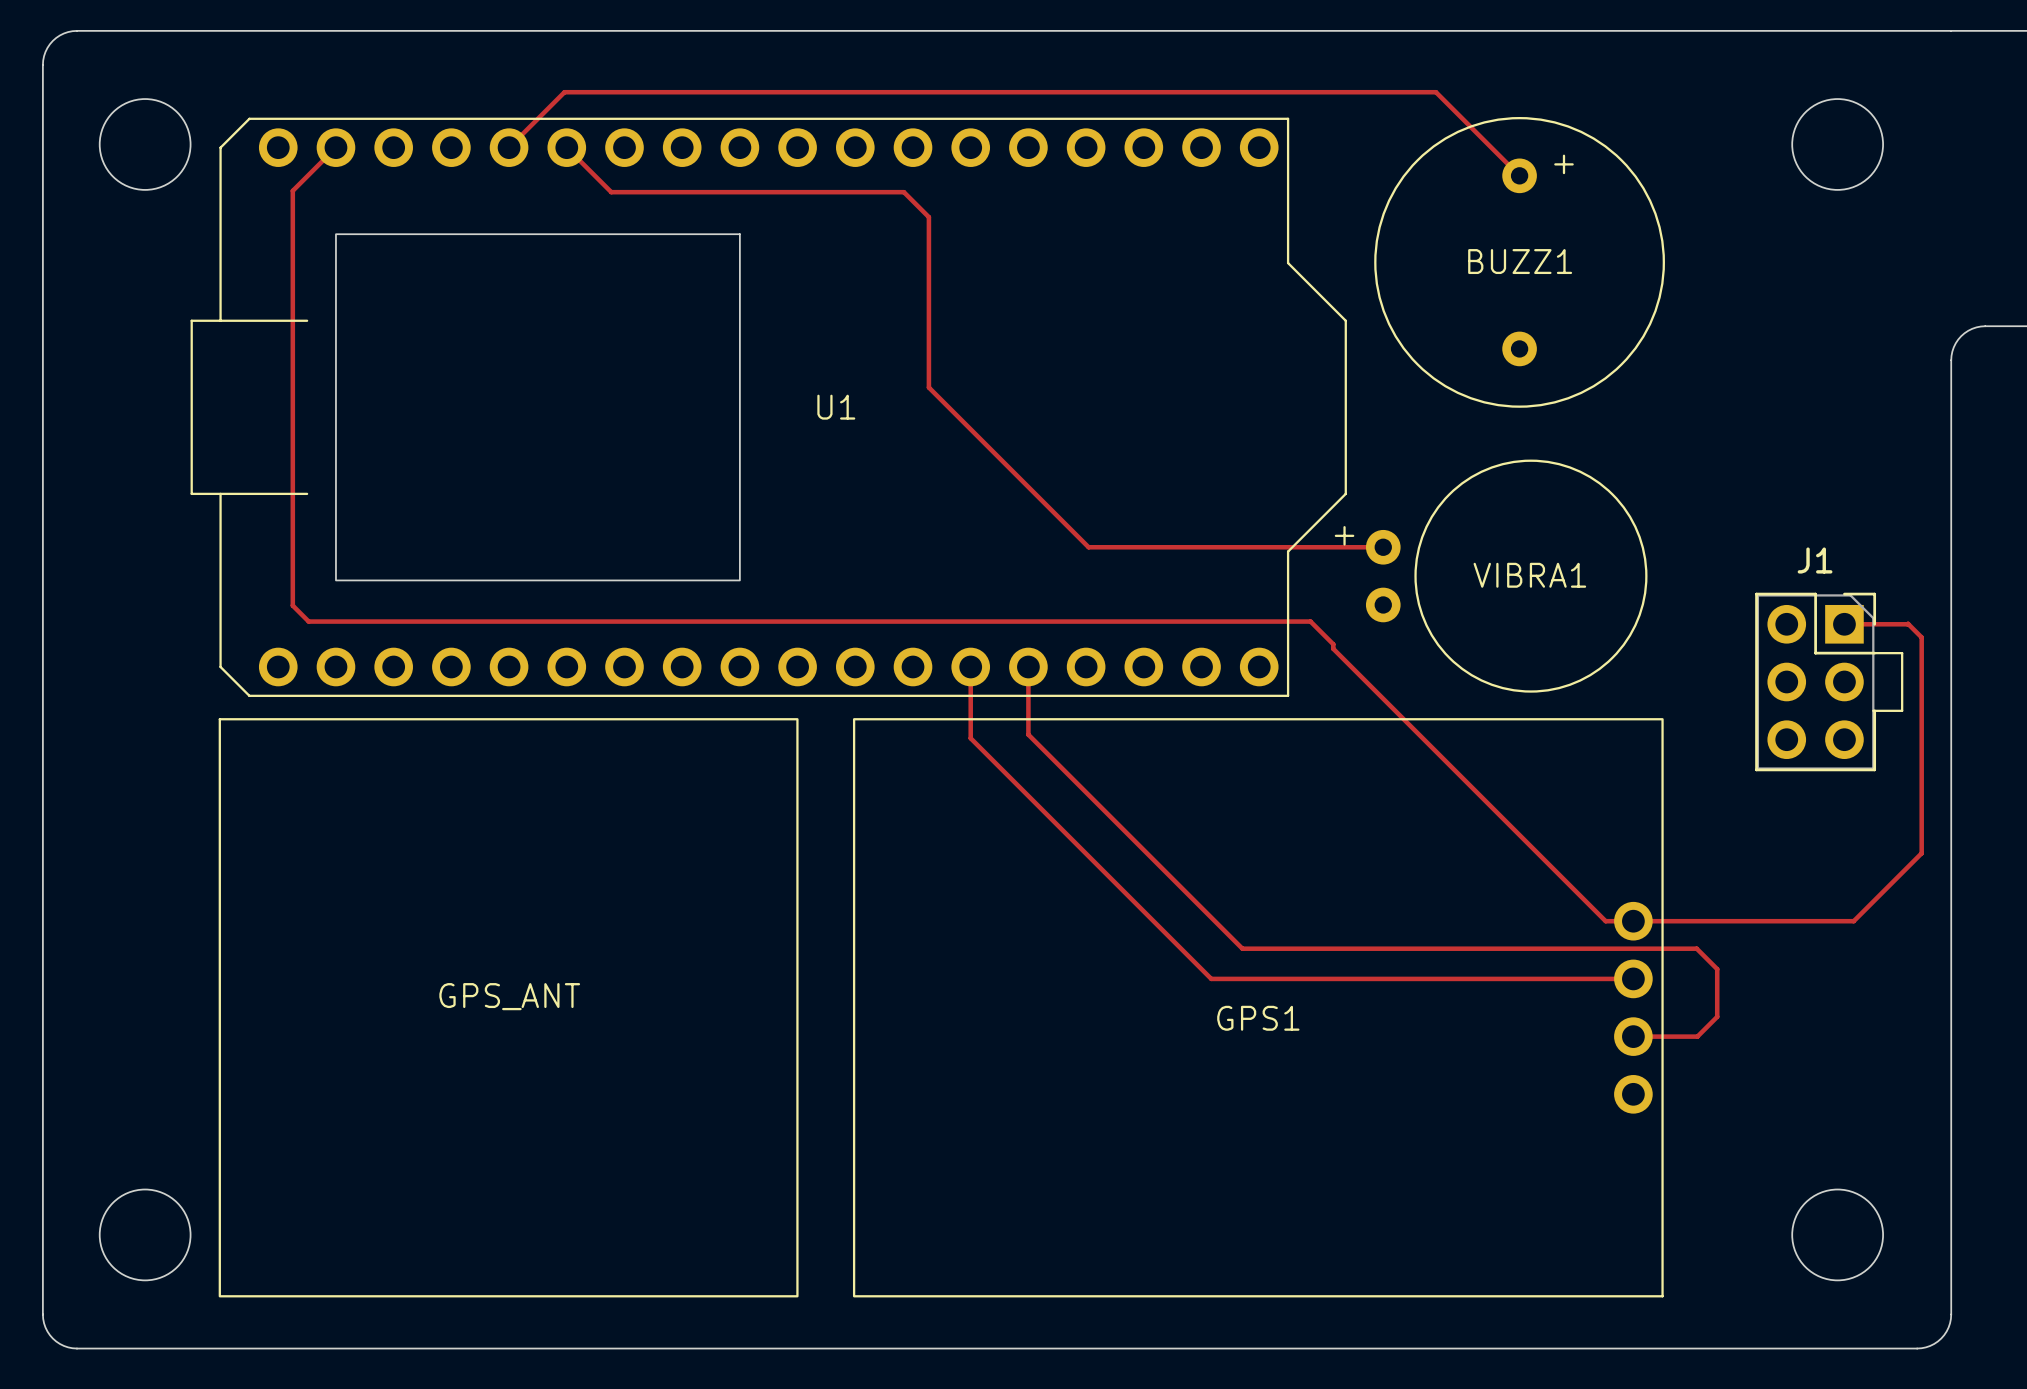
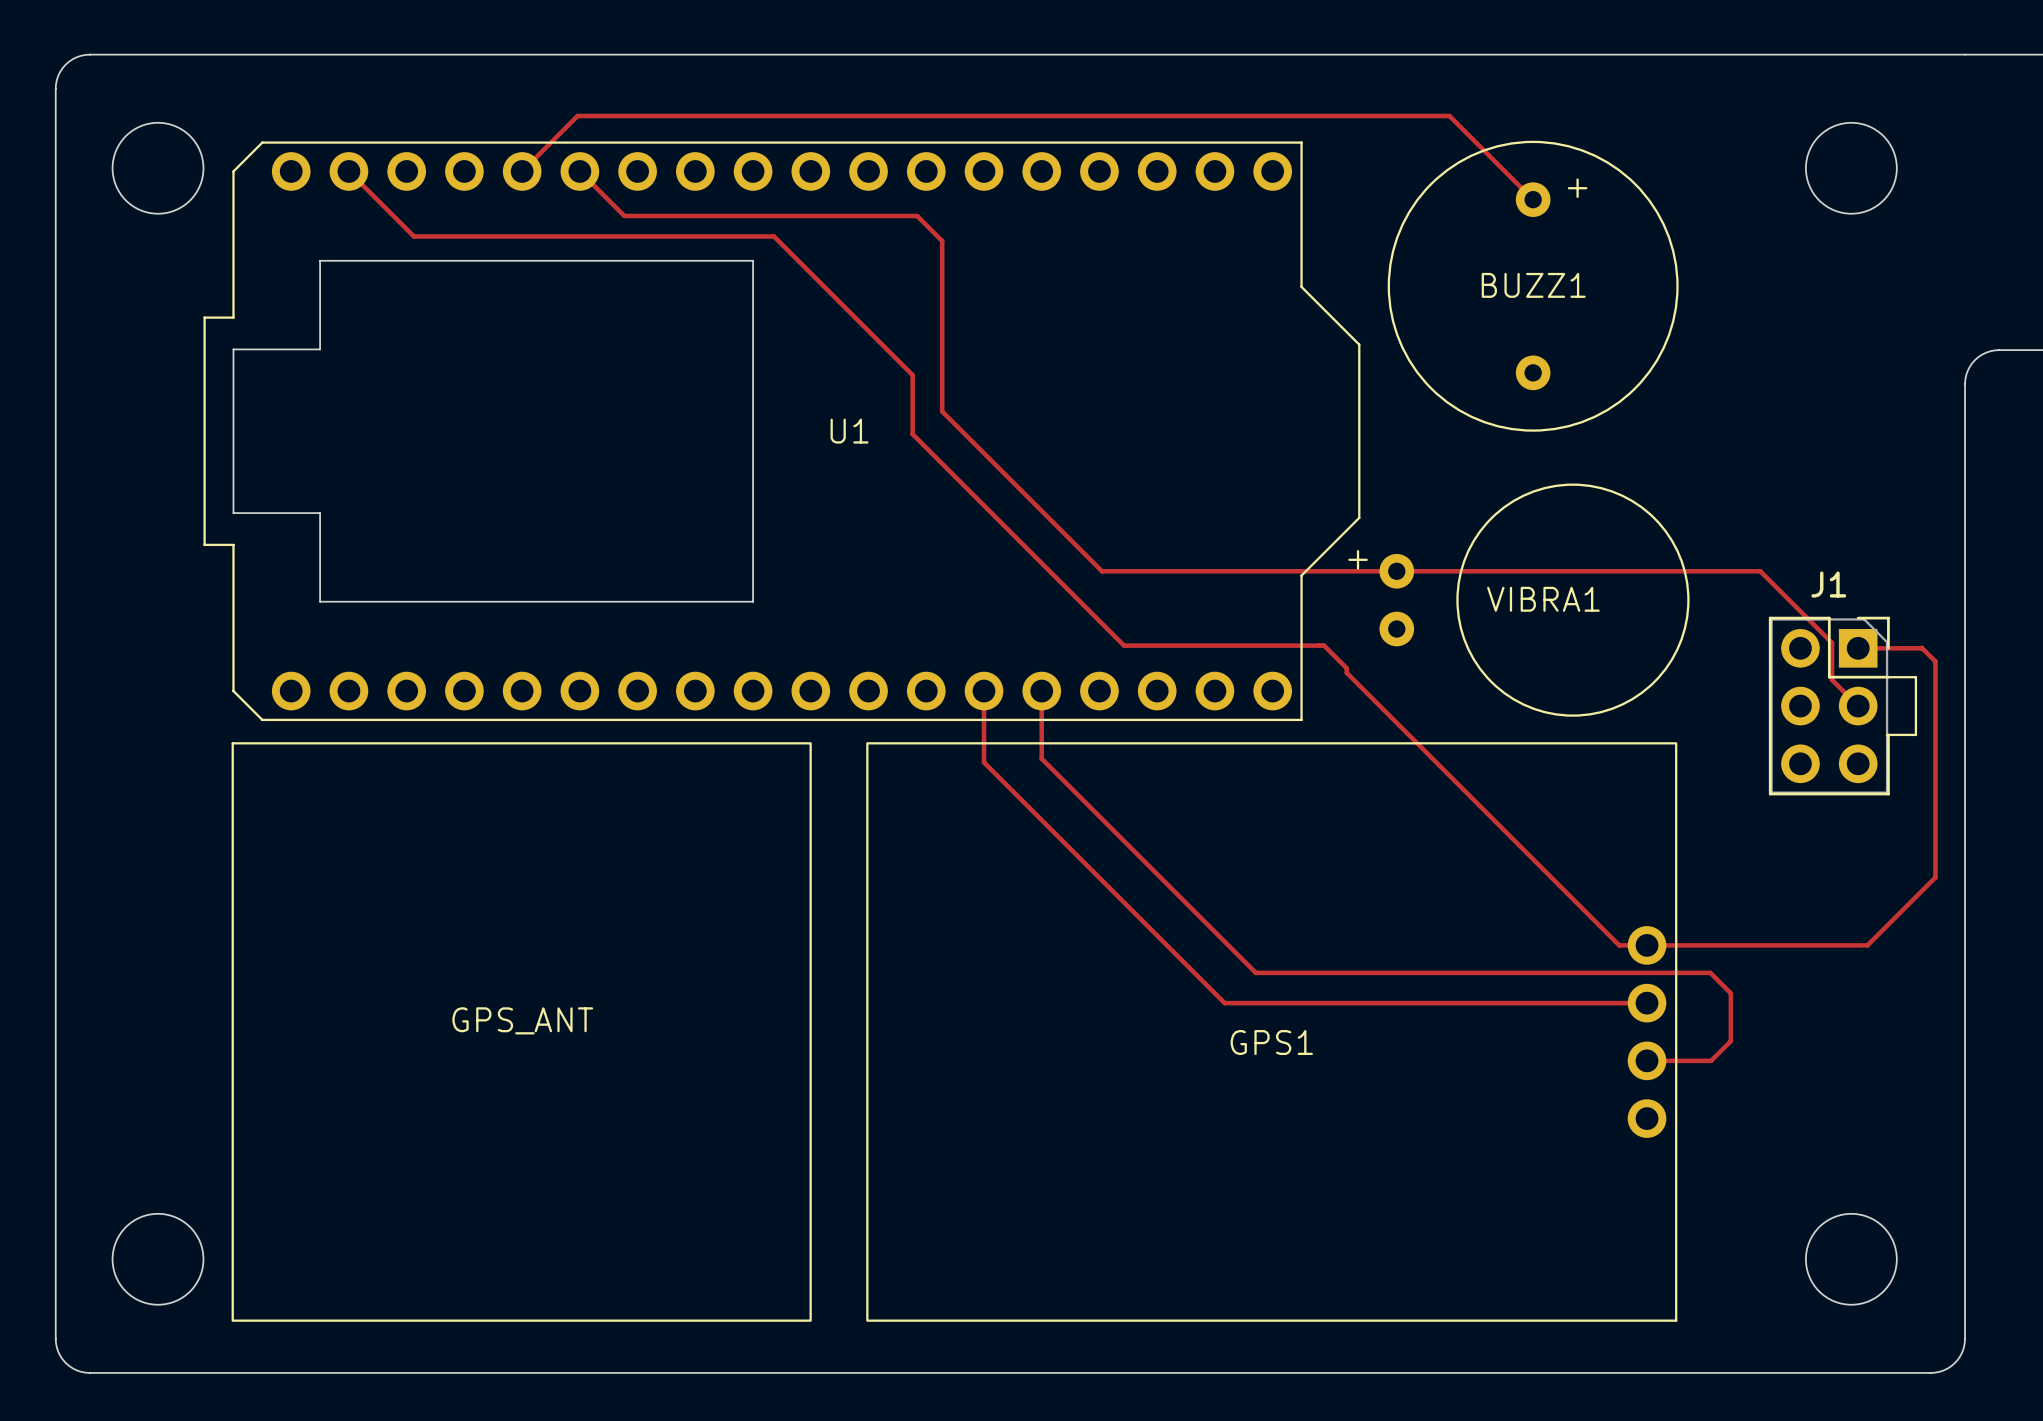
U1 footprint: [190, 117, 1347, 697] -> [203, 141, 1361, 722]
track: (335, 147) (292, 190) (292, 605) (308, 621) (1110, 621) -> (348, 171) (413, 236) (773, 236) (912, 375) (912, 434) (1124, 645)
VIBRA1 footprint: [1365, 459, 1648, 693] -> [1379, 483, 1690, 717]
track: none -> (1396, 571) (1760, 571) (1832, 642) (1832, 679) (1858, 706)

